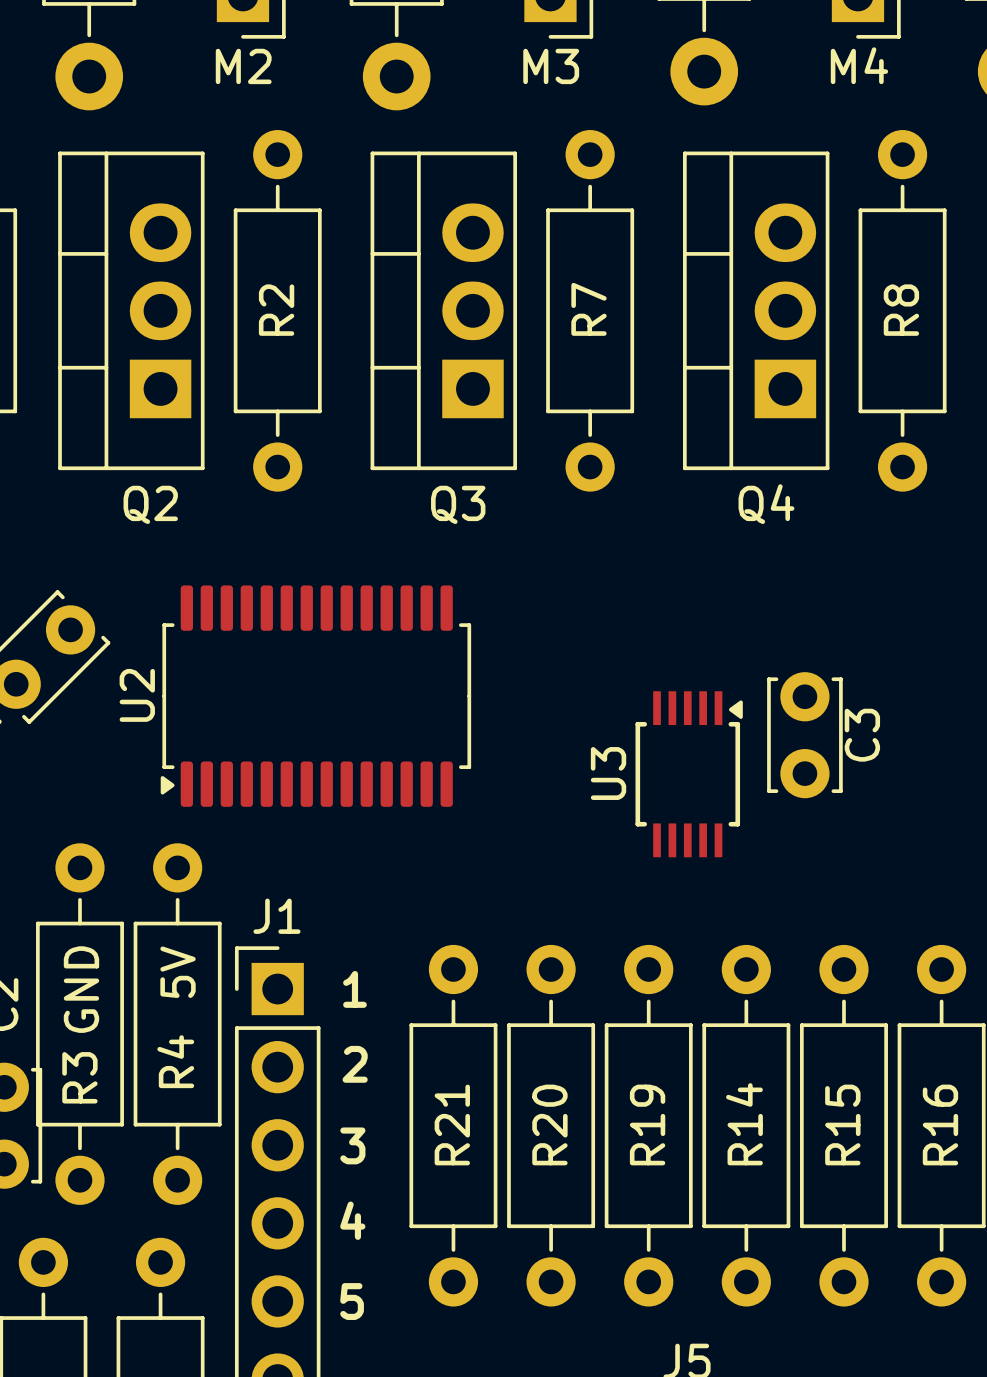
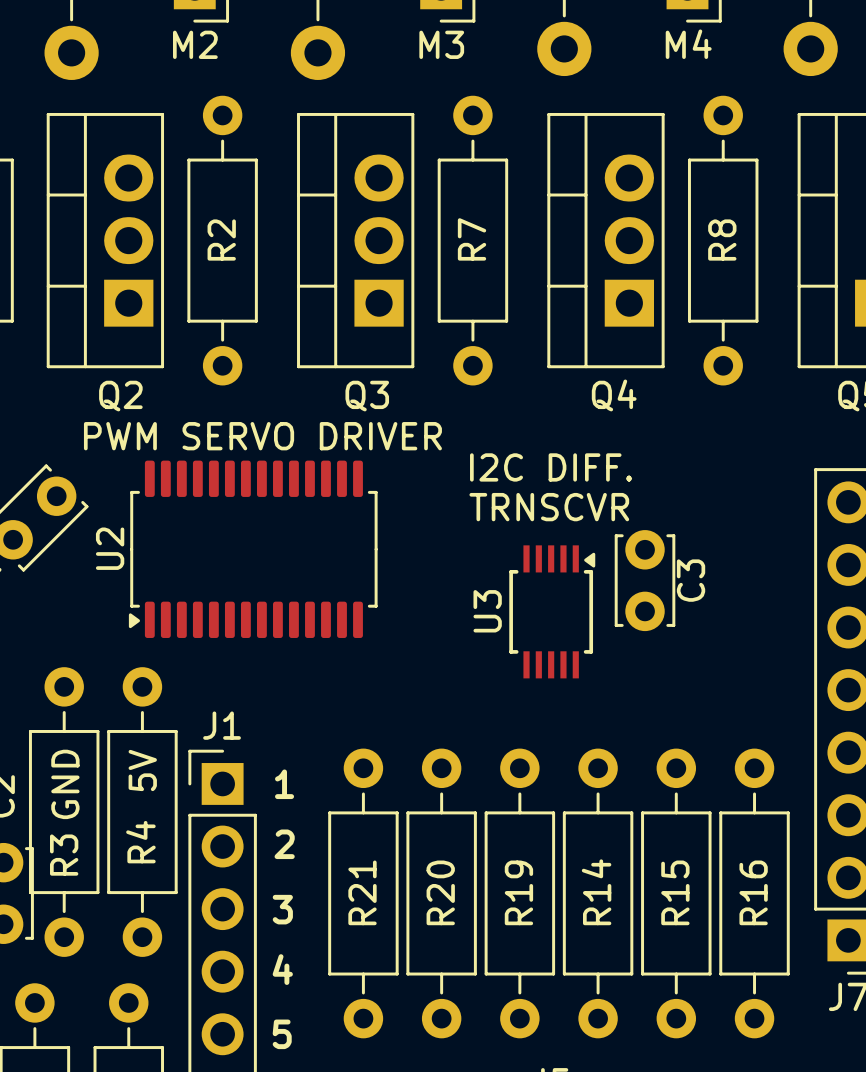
text: none -> PWM SERVO DRIVER (262, 436)
text: none -> I2C DIFF. (551, 467)
text: none -> TRNSCVR (549, 507)

